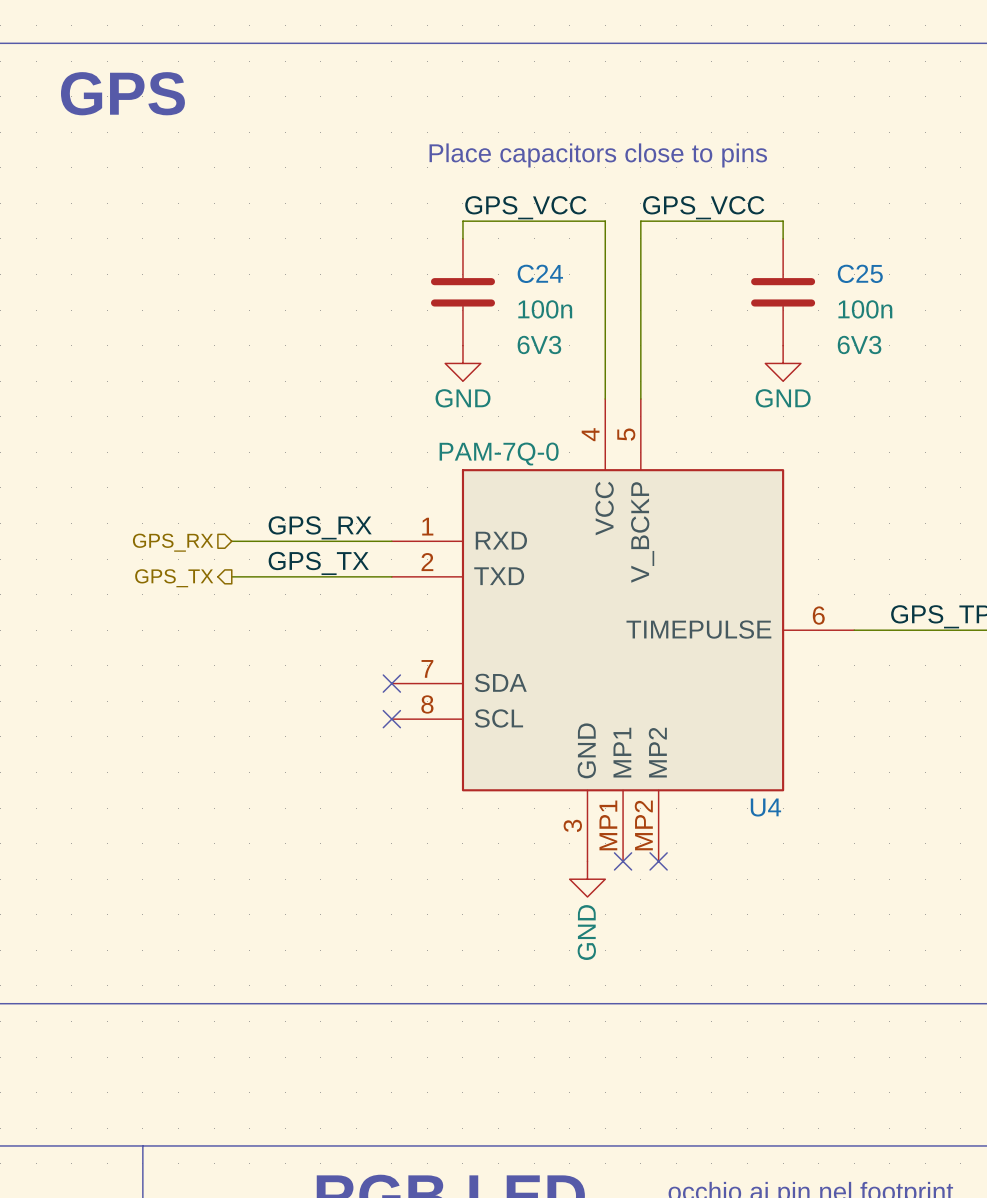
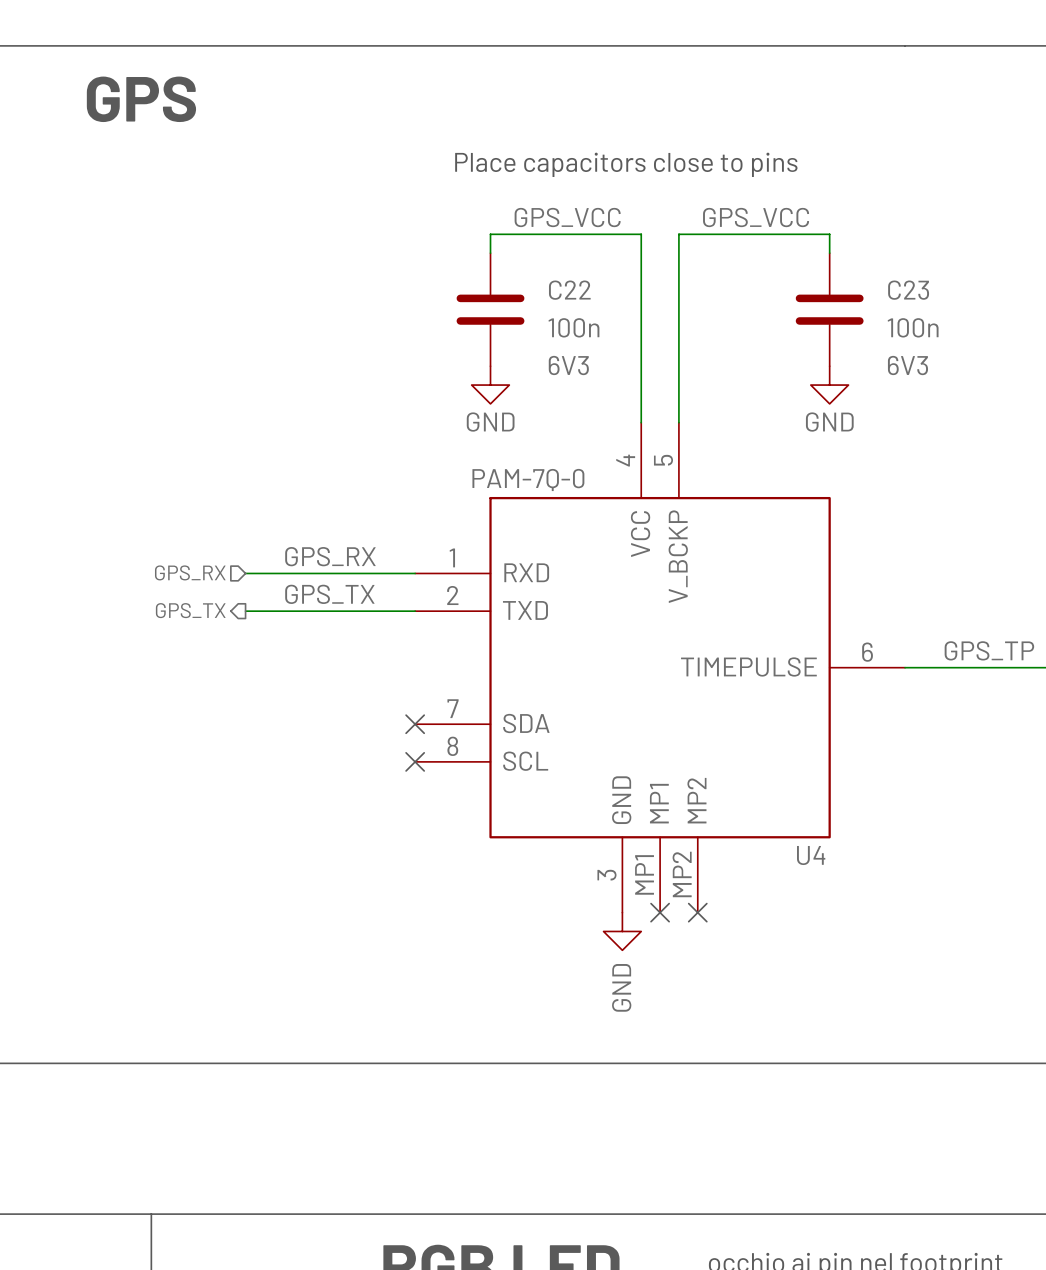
C24 name: C24 (540, 273) -> C22 (569, 290)
C25 name: C25 (860, 273) -> C23 (908, 290)

